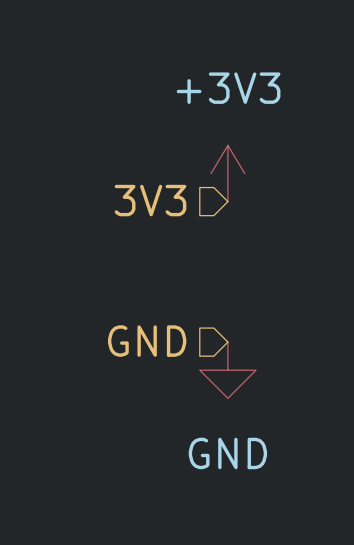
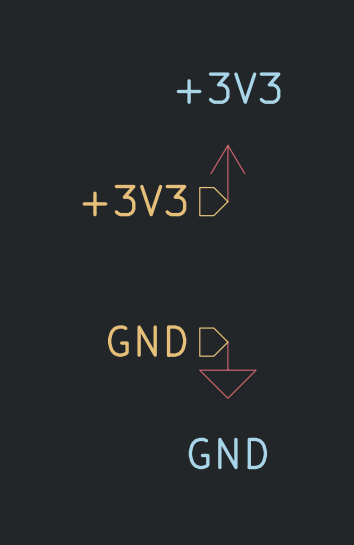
hierarchical label: 3V3 (150, 200) -> +3V3 (134, 200)

